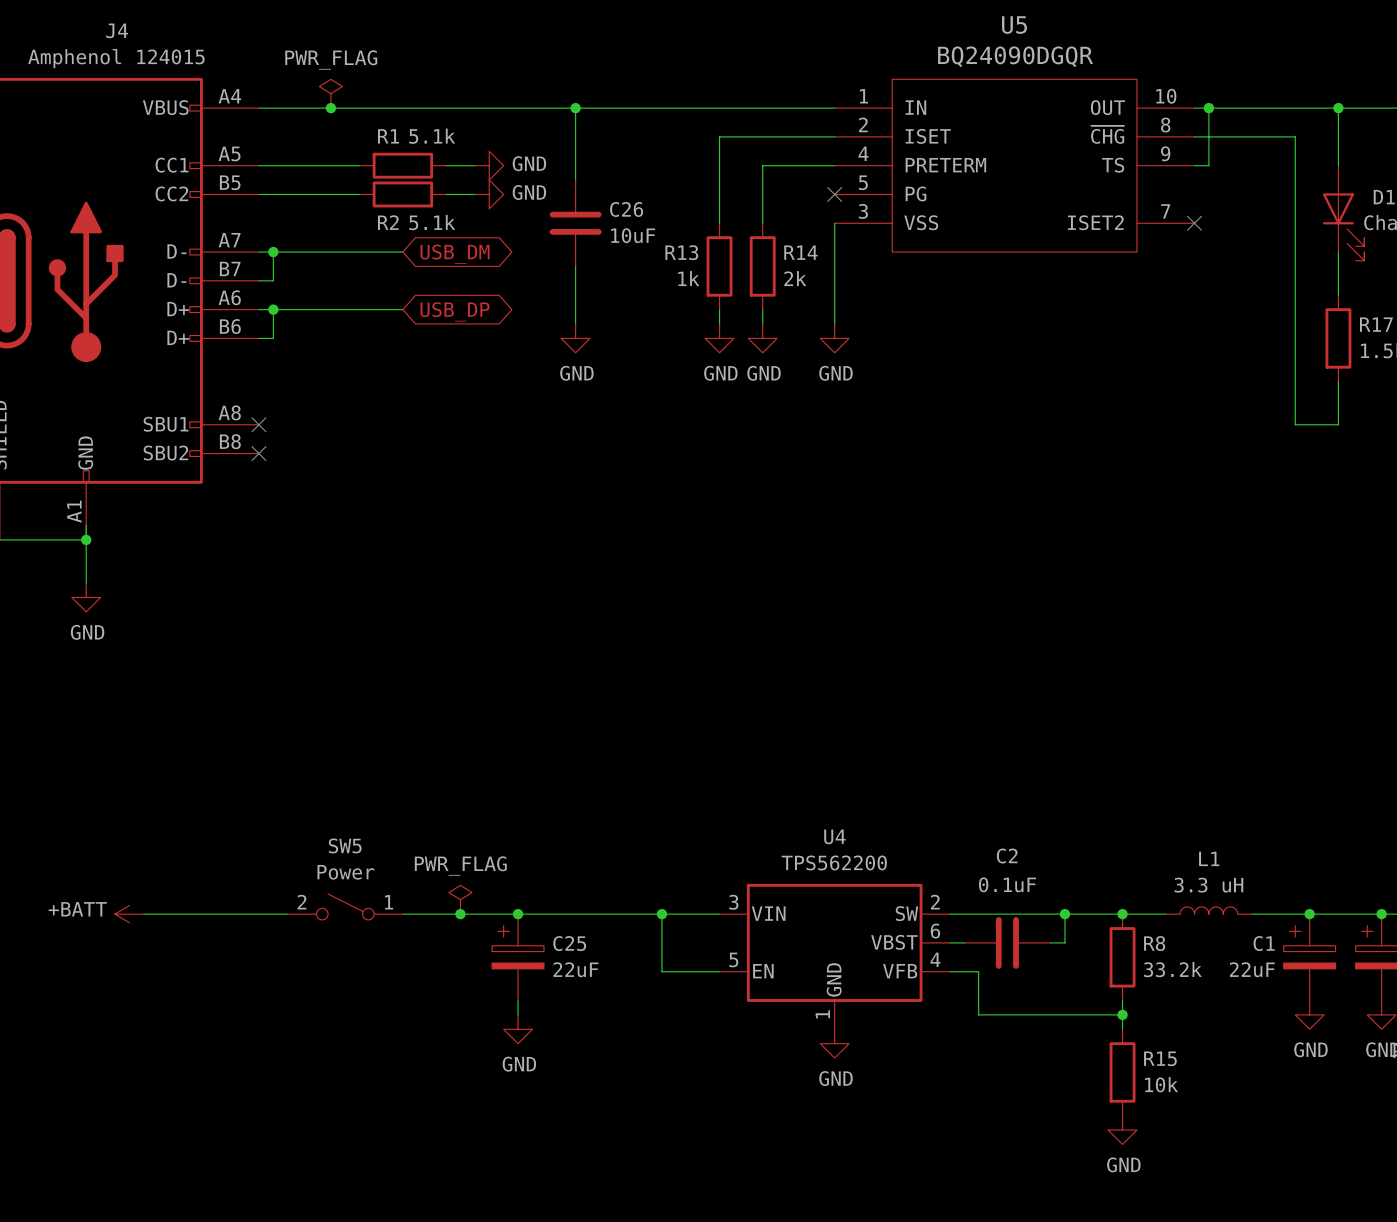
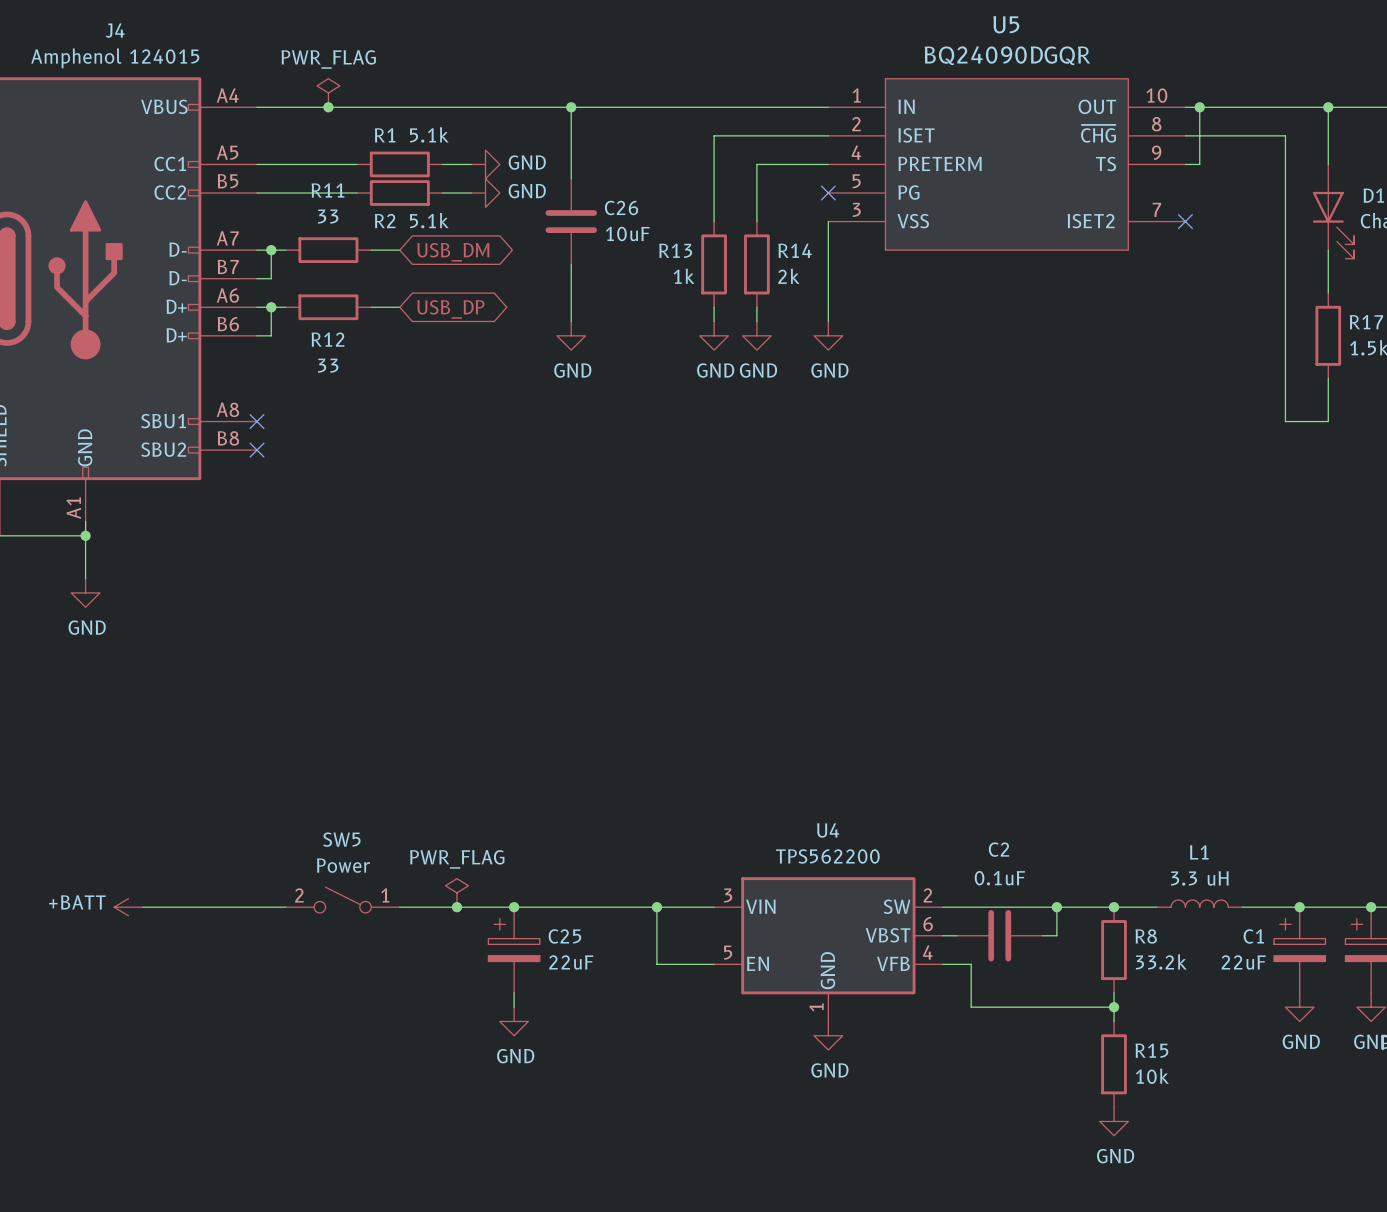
wire: (287, 252) (374, 252) -> none
R11: none -> 33 (328, 250)
wire: (287, 309) (374, 309) -> none
R12: none -> 33 (328, 307)

